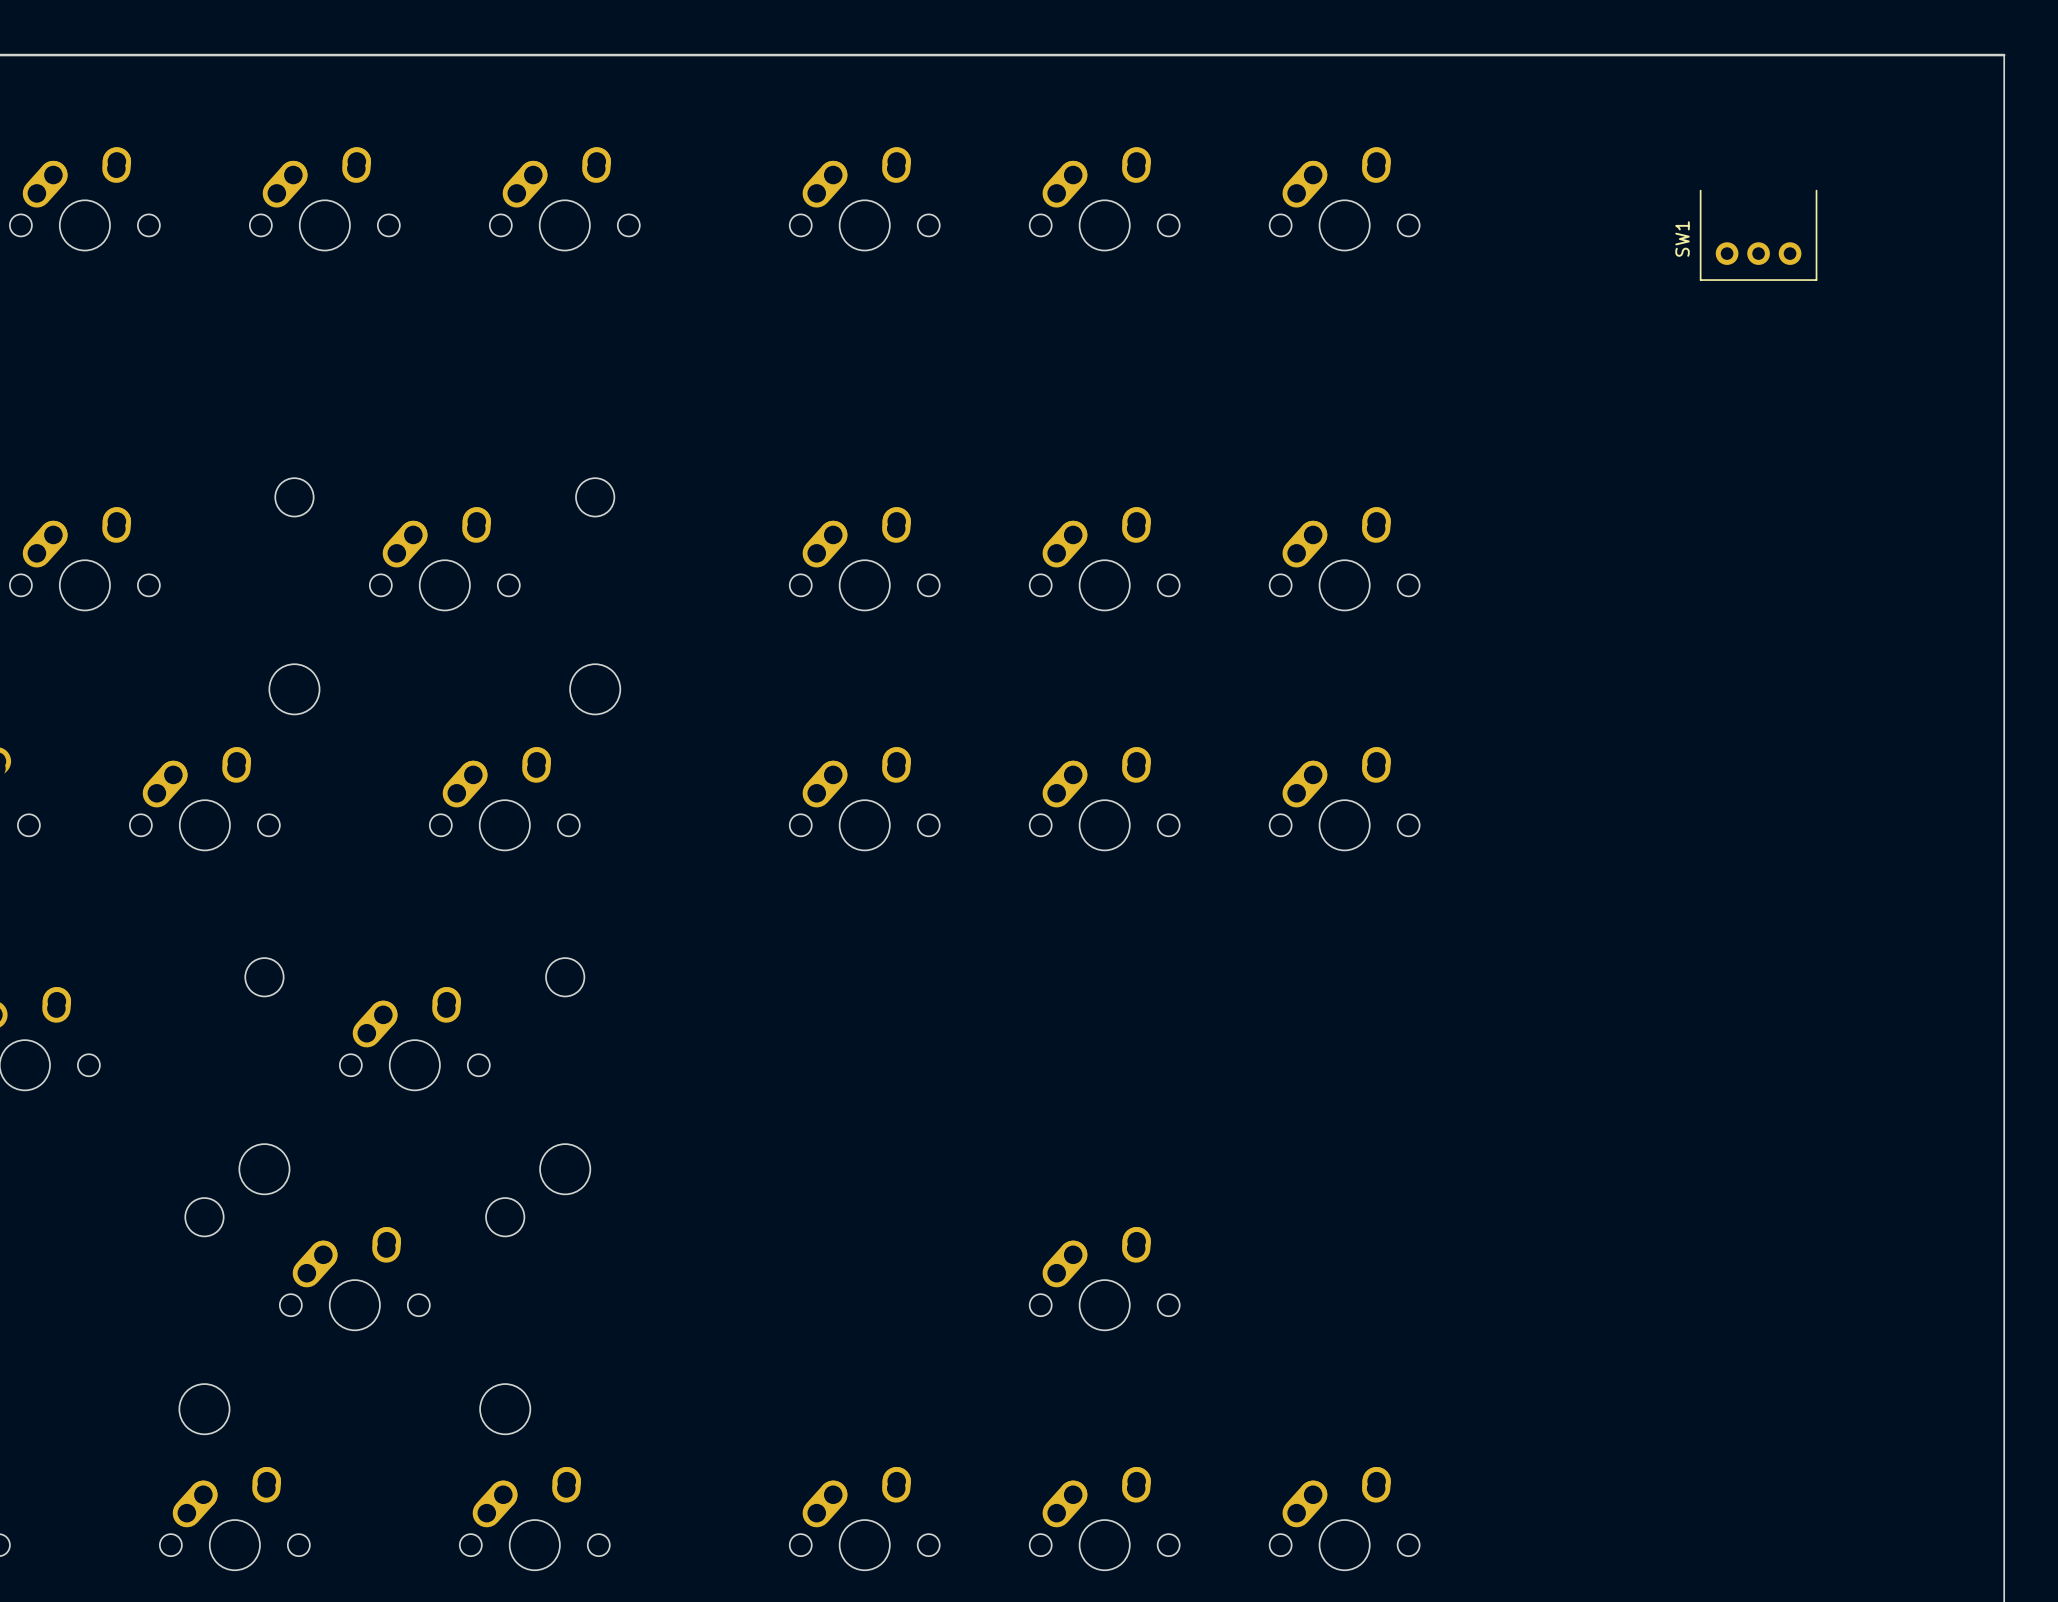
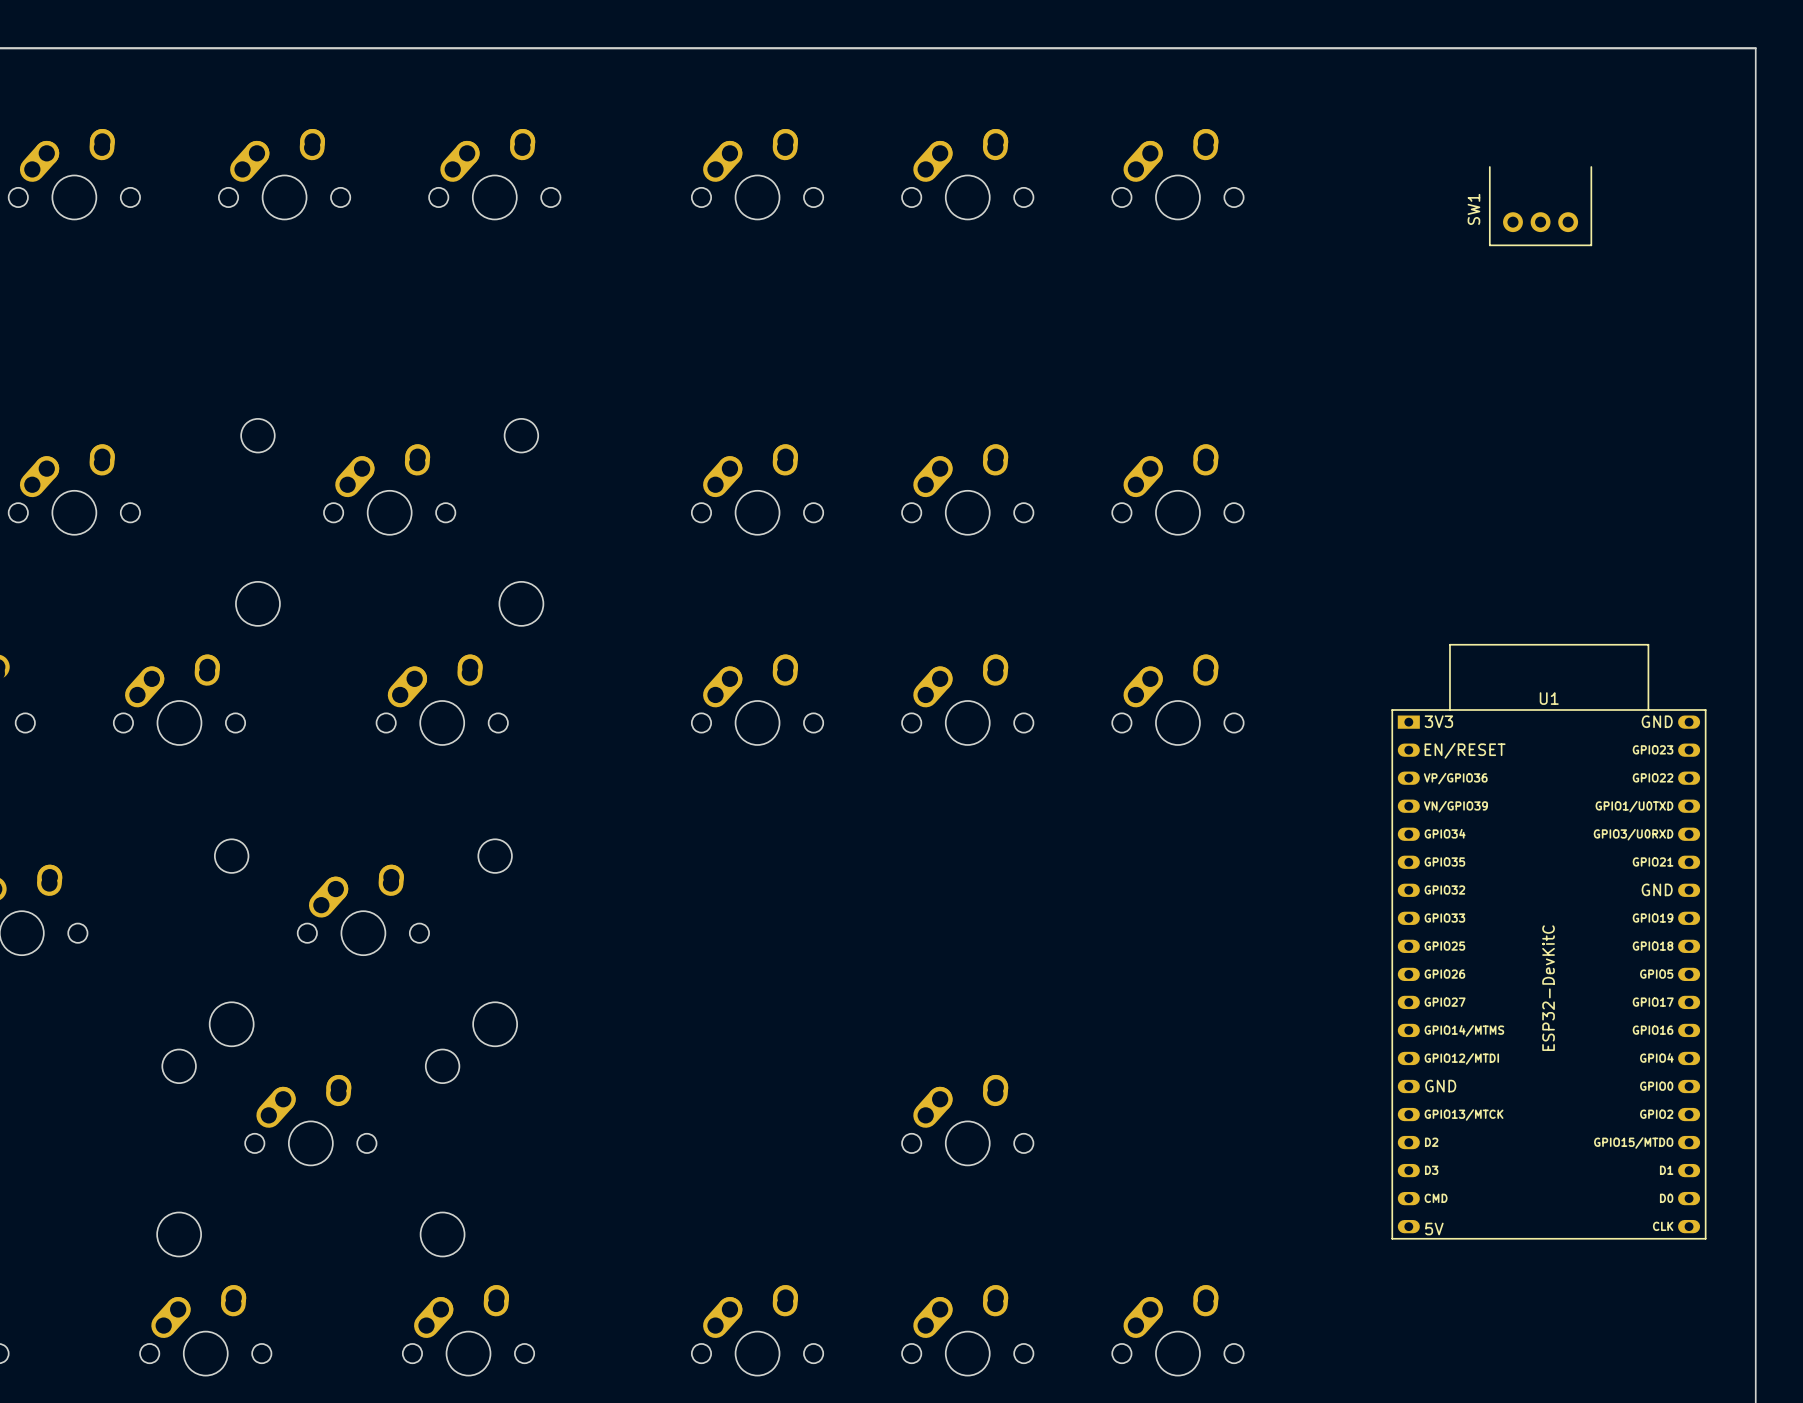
U1: none -> ESP32-DevKitC (1548, 941)

